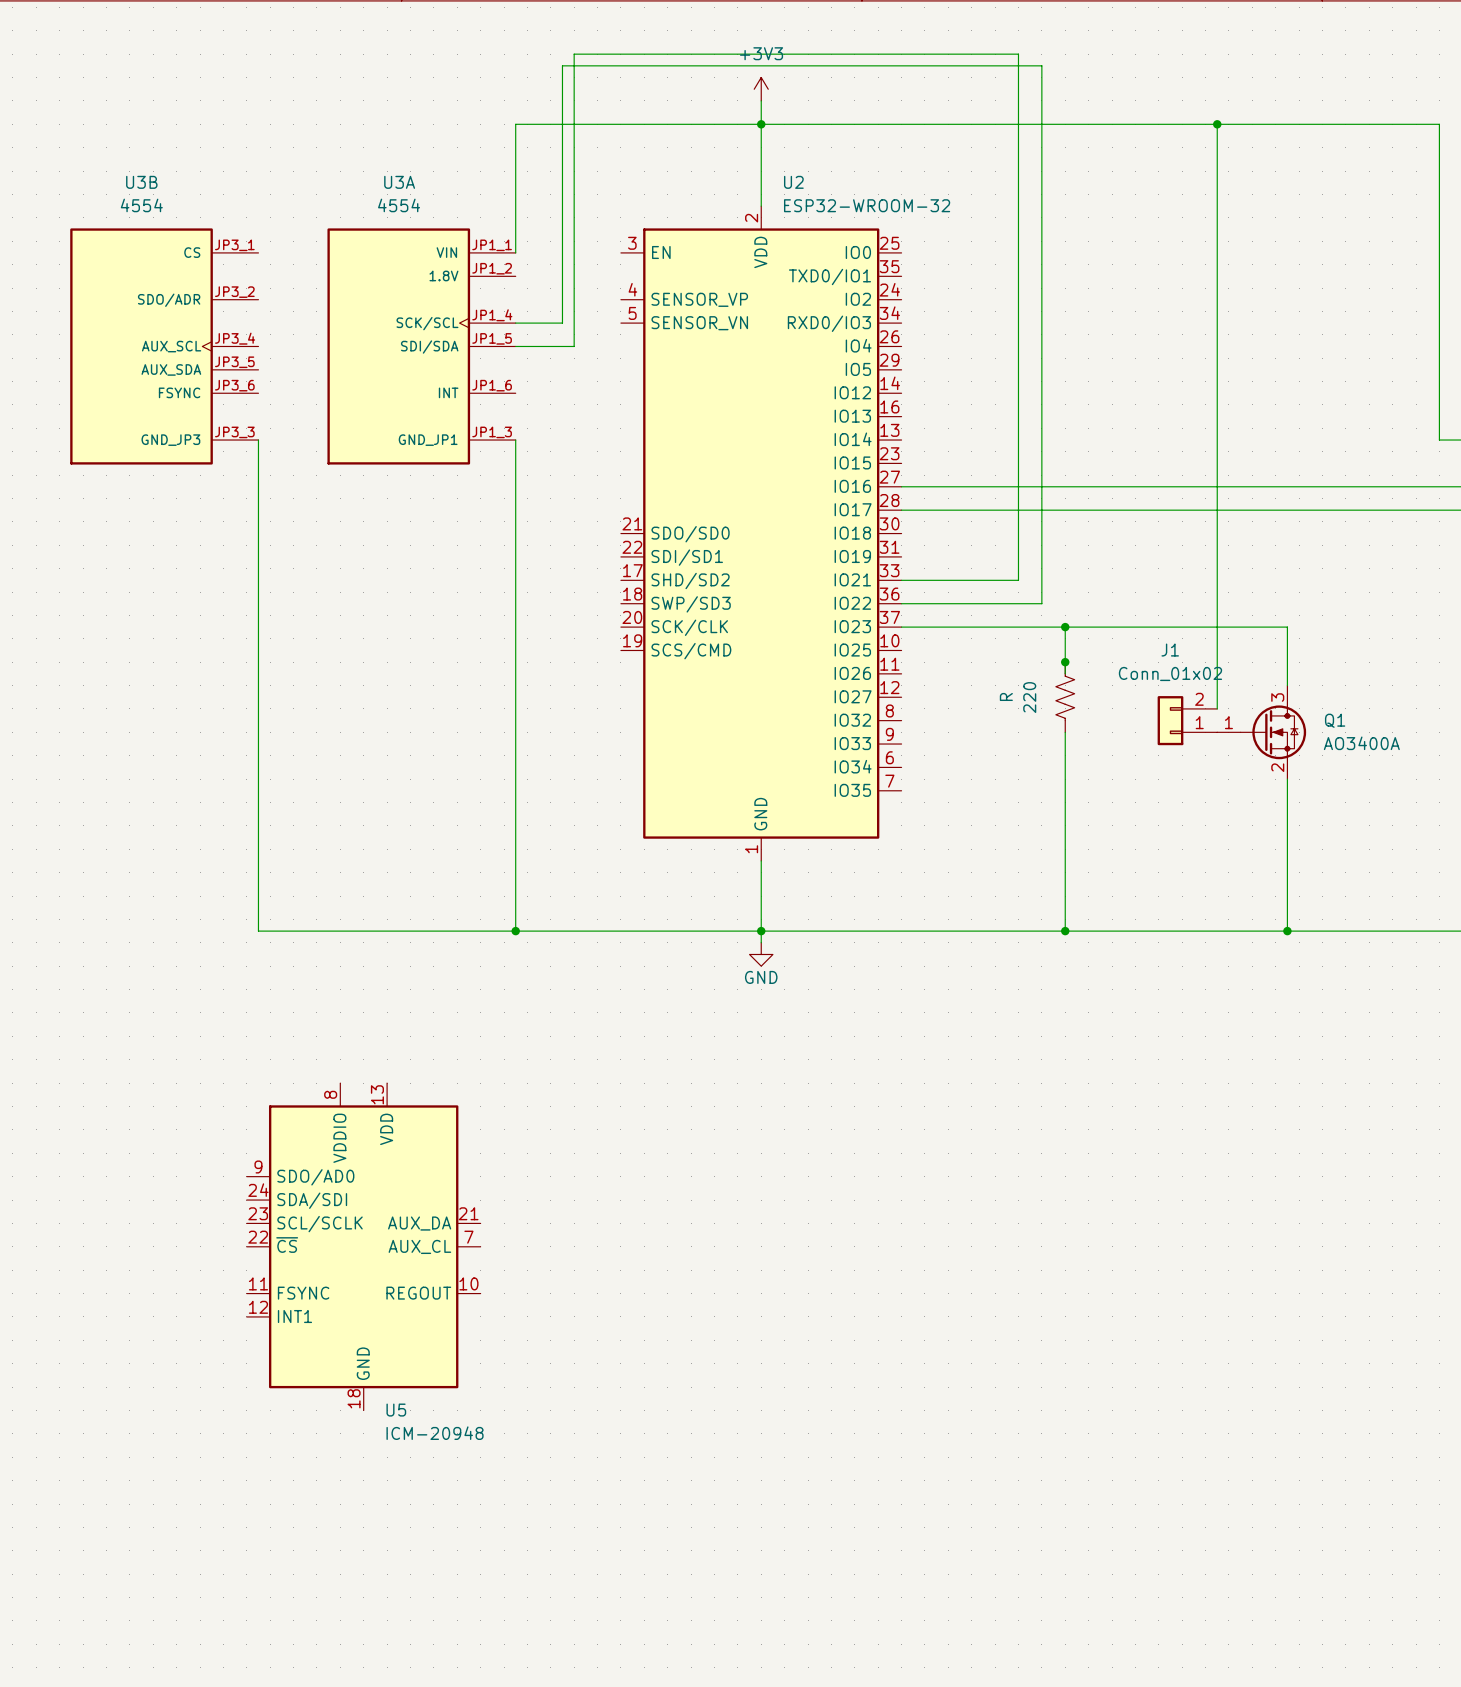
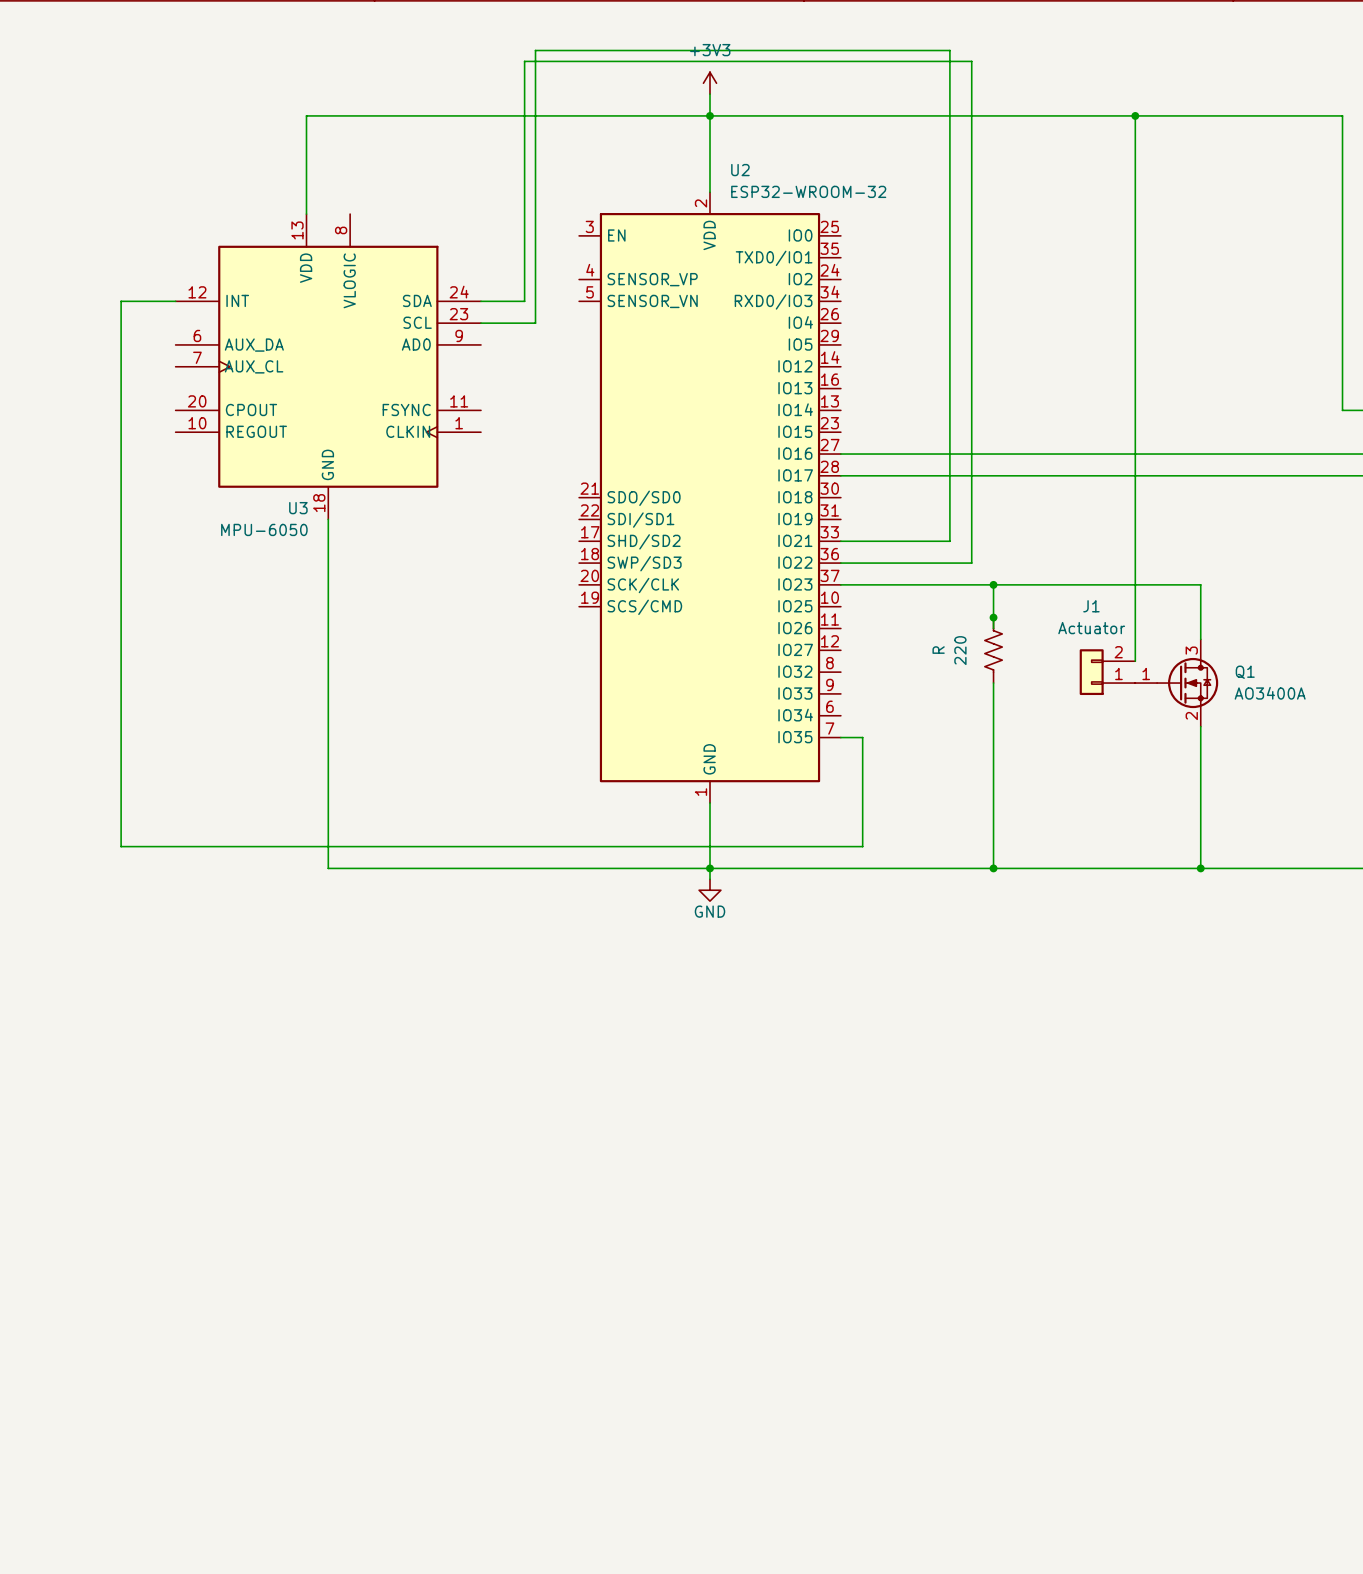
wire: (515, 124) (515, 252) -> (480, 115) (306, 115) (306, 214)
wire: none -> (175, 301) (121, 301) (121, 846) (862, 846) (862, 737) (840, 737)
U3B: 4554 (164, 346) -> none
U3A: 4554 (421, 346) -> none
U3: none -> MPU-6050 (328, 366)
wire: (258, 440) (258, 931) (352, 931) -> (328, 519) (328, 868)
wire: (515, 440) (515, 931) -> none
J1 value: Conn_01x02 (1170, 673) -> Actuator (1091, 628)
junction: (515, 931) -> none
U5: ICM-20948 (363, 1246) -> none

